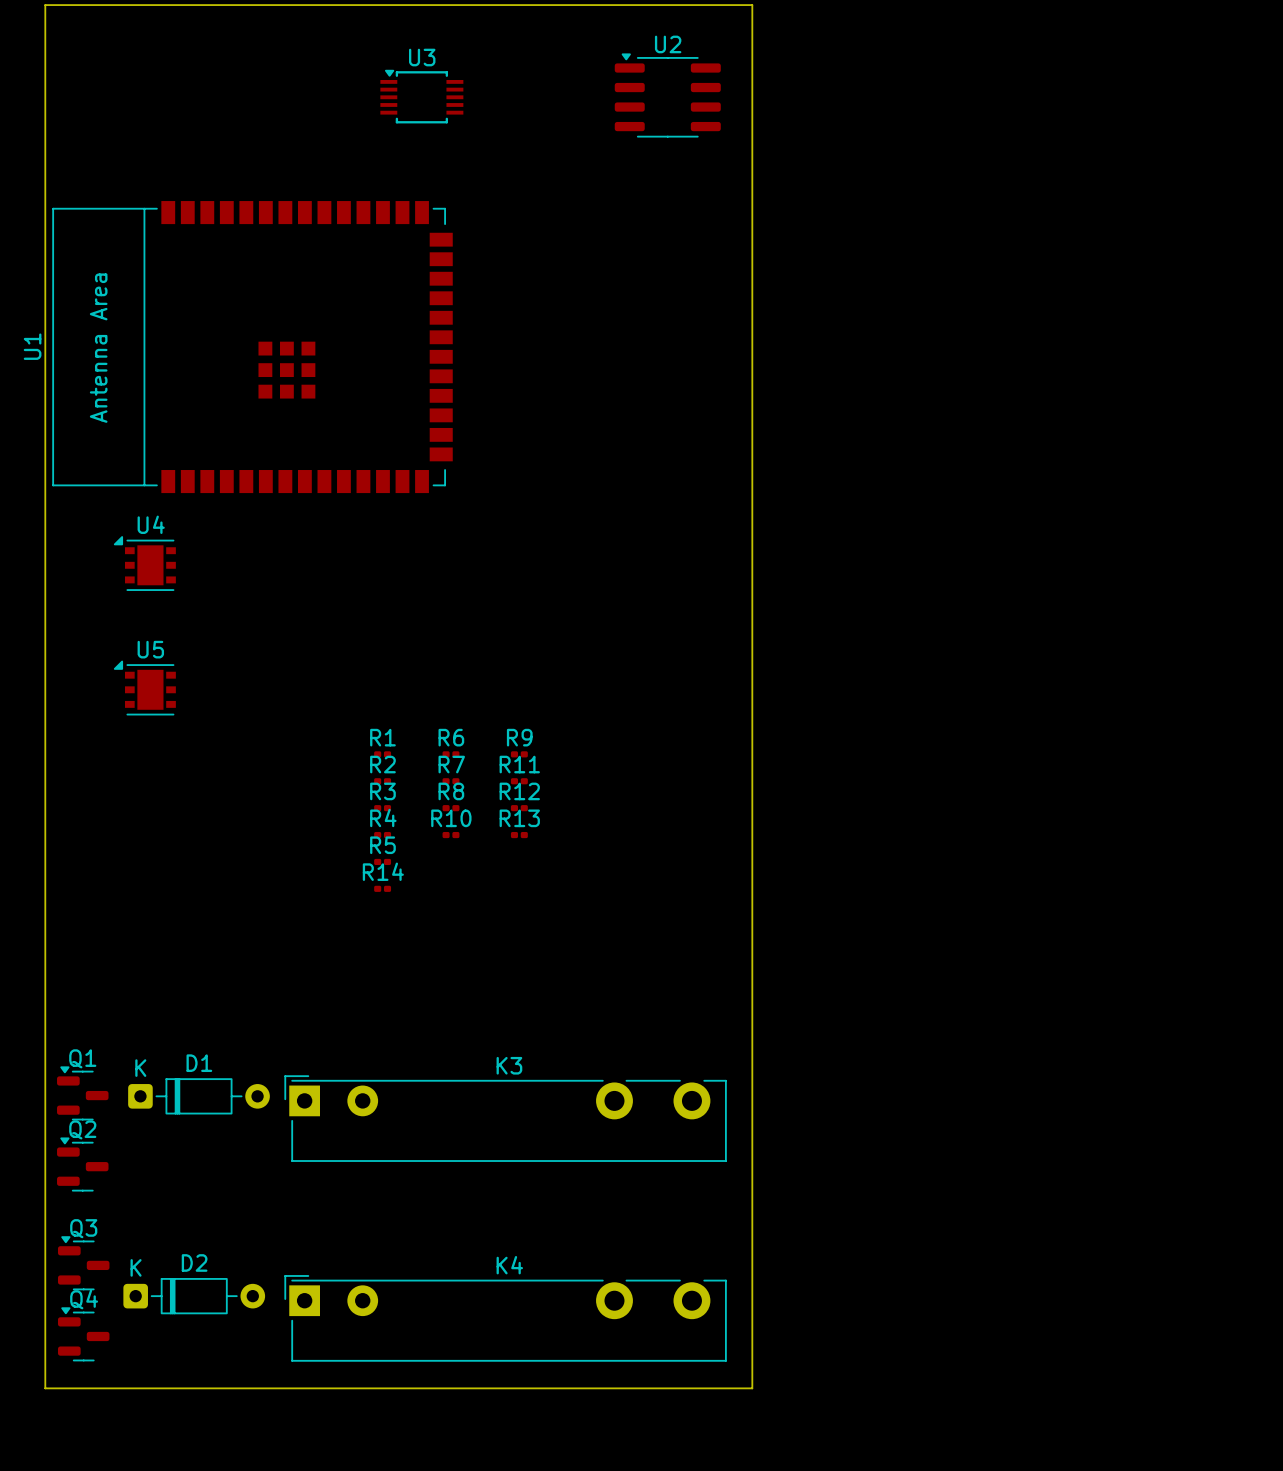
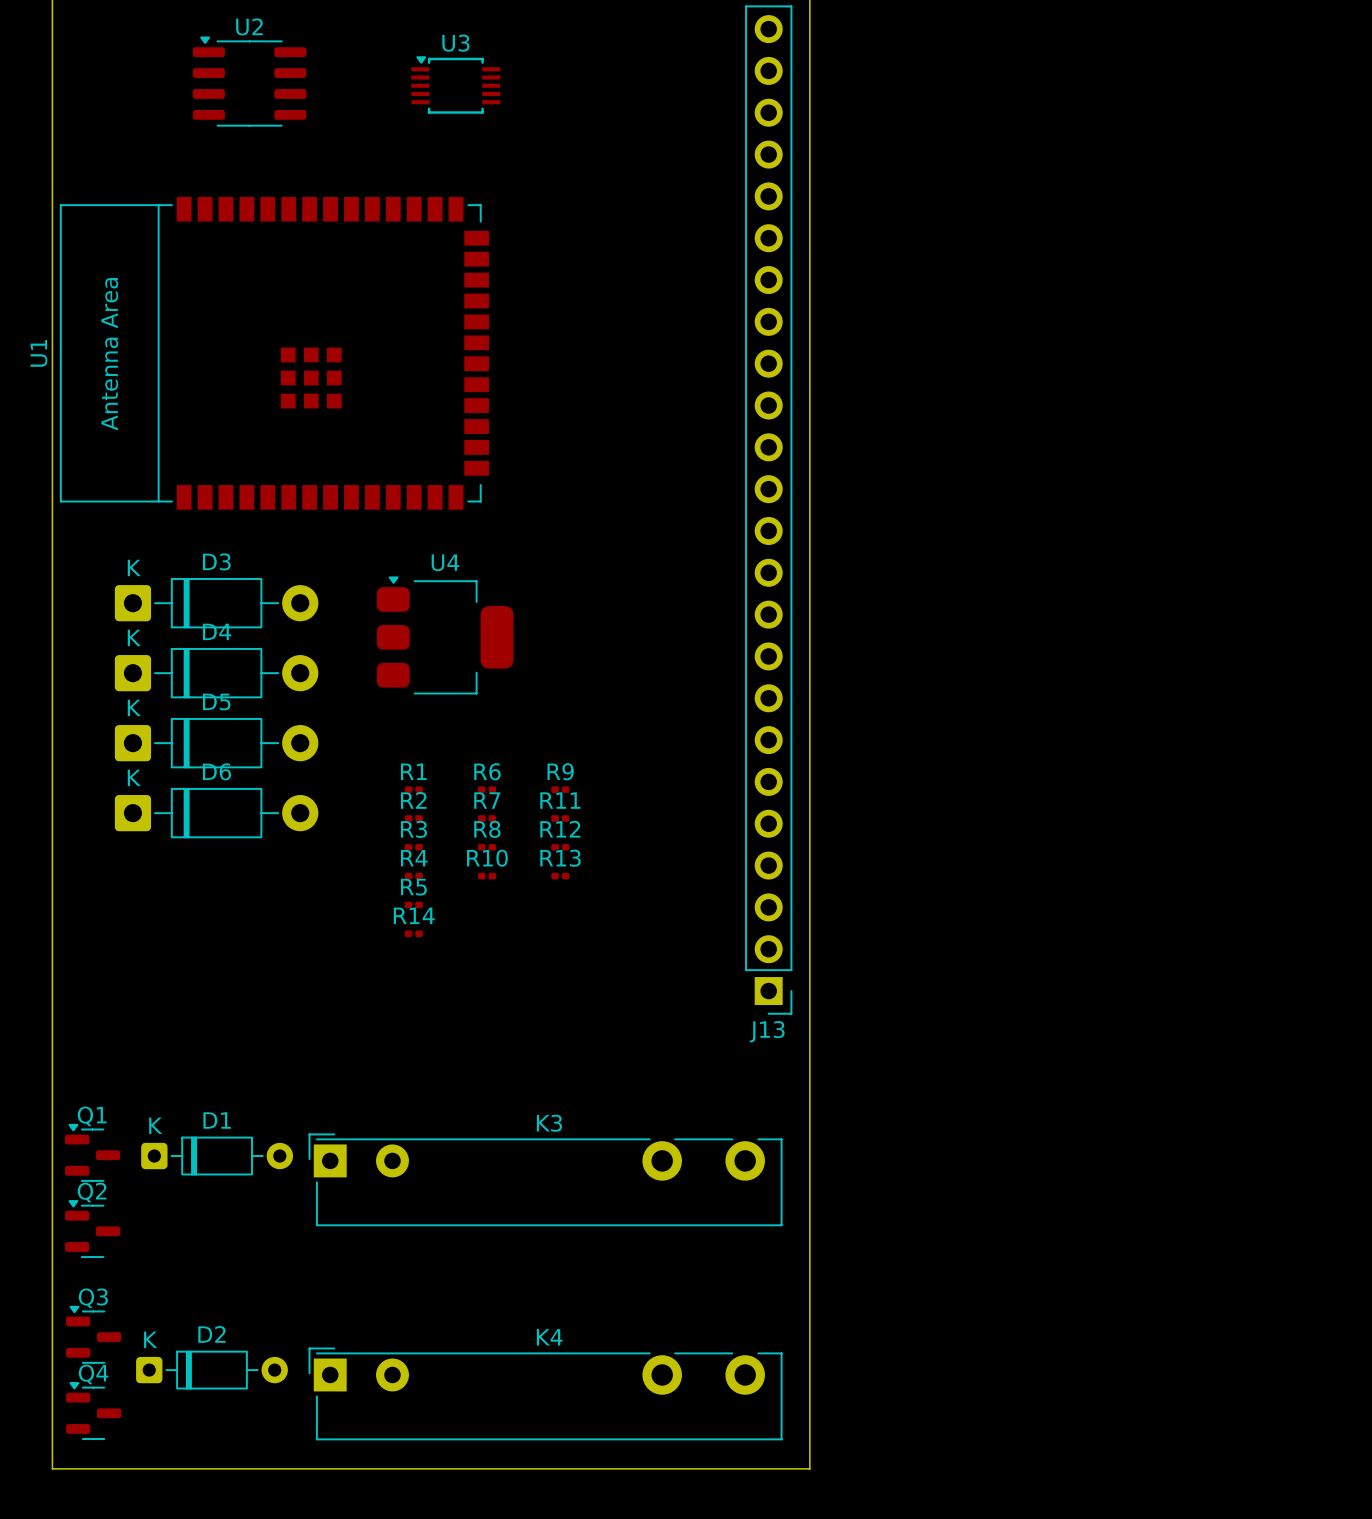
U2 position: (667, 95) -> (249, 81)
J13: none -> (768, 510)
U4 footprint: [113, 536, 176, 591] -> [376, 576, 514, 695]
D3: none -> (216, 603)
D4: none -> (216, 673)
U5: (144, 688) -> none
D5: none -> (216, 743)
D6: none -> (216, 813)

